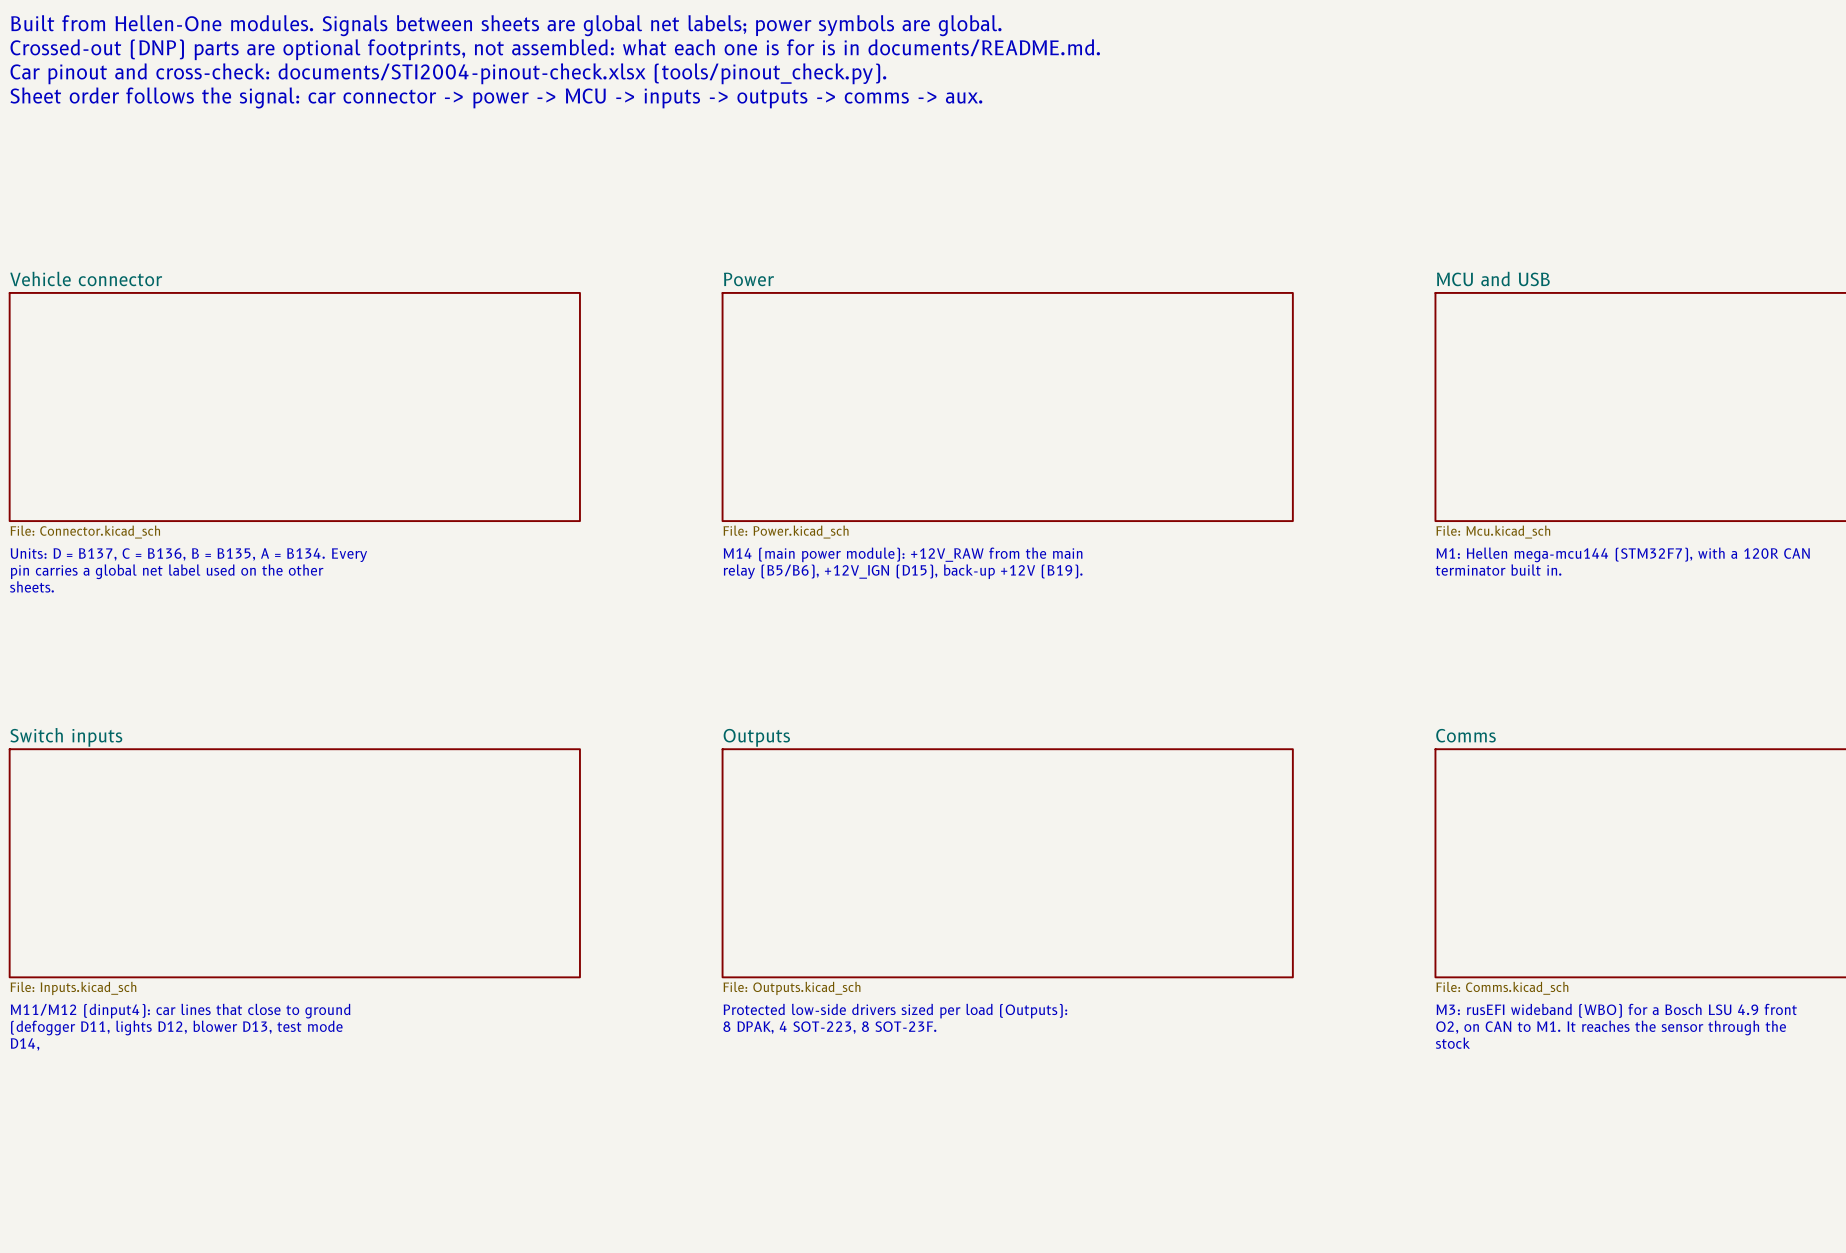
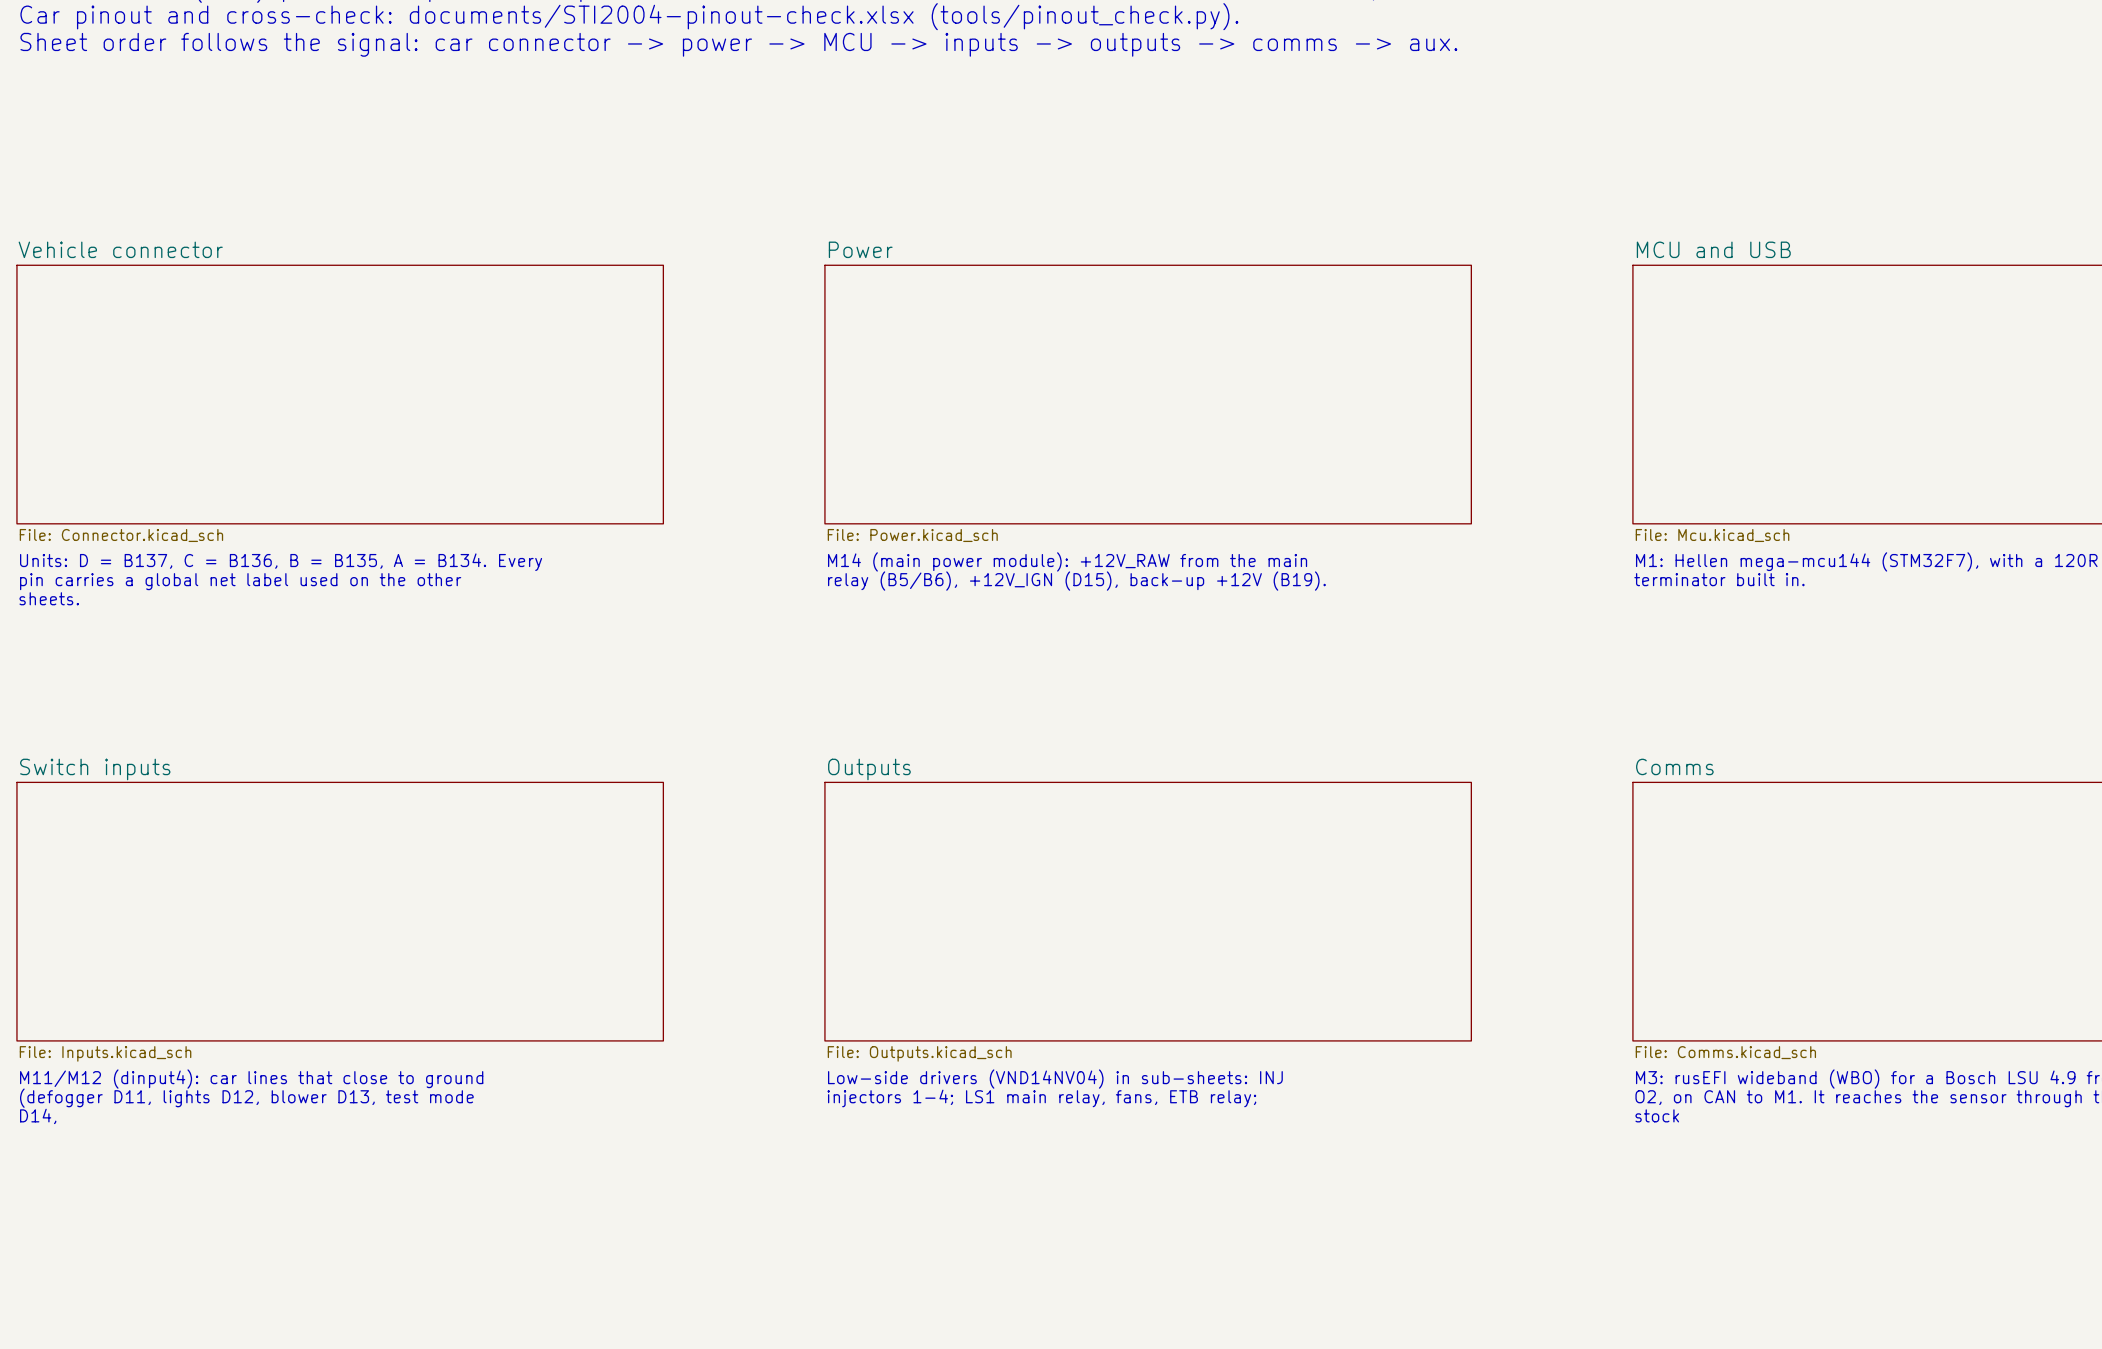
text: Protected low-side drivers sized per load (Outputs): (895, 1011) -> Low-side drivers (VND14NV04) in sub-sheets: INJ (1055, 1079)
text: 8 DPAK, 4 SOT-223, 8 SOT-23F. (829, 1027) -> injectors 1-4; LS1 main relay, fans, ETB relay; (1041, 1098)

